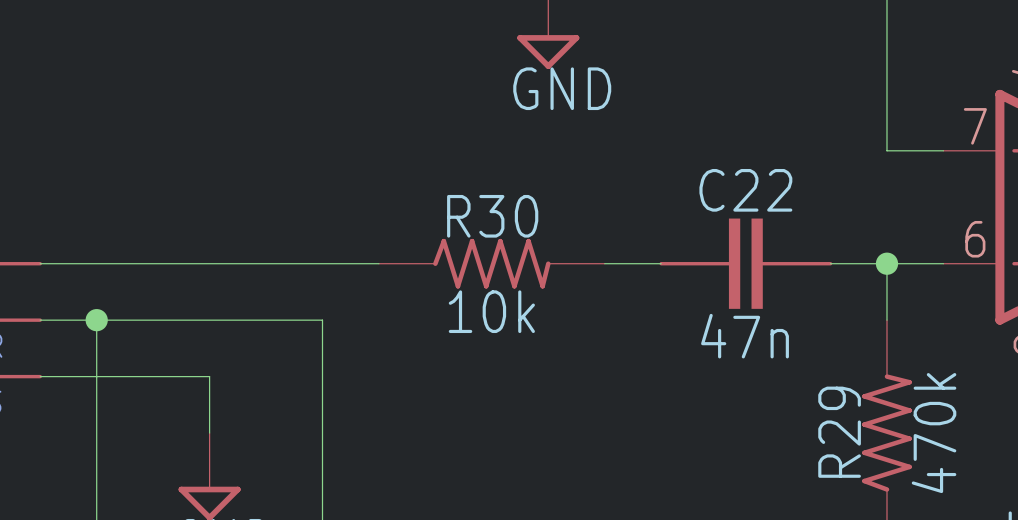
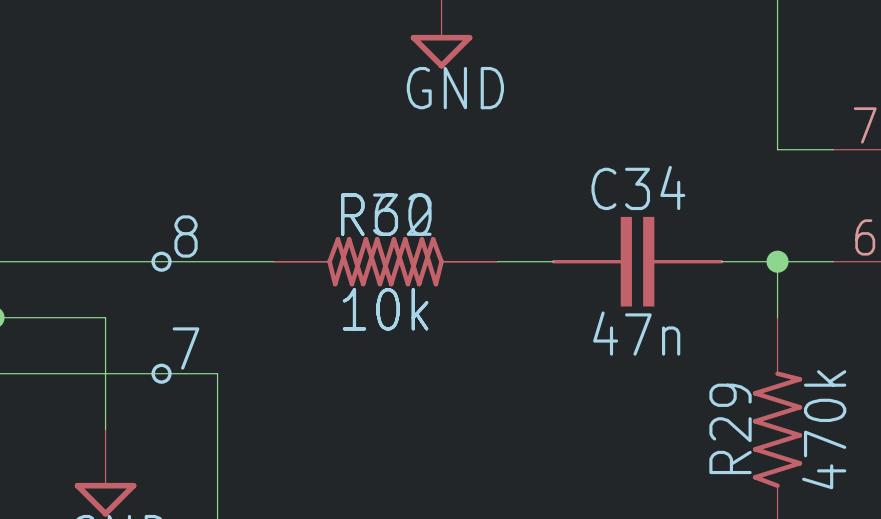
C22 name: C22 (745, 190) -> C34 (638, 187)
text: none -> 8 (186, 236)
drawing: none -> [151, 251, 172, 272]
part: none -> 10k (385, 261)
wire: (209, 320) (322, 320) (322, 376) -> (105, 317) (105, 373) (217, 373)
text: none -> 7 (186, 348)
drawing: none -> [151, 363, 172, 384]

